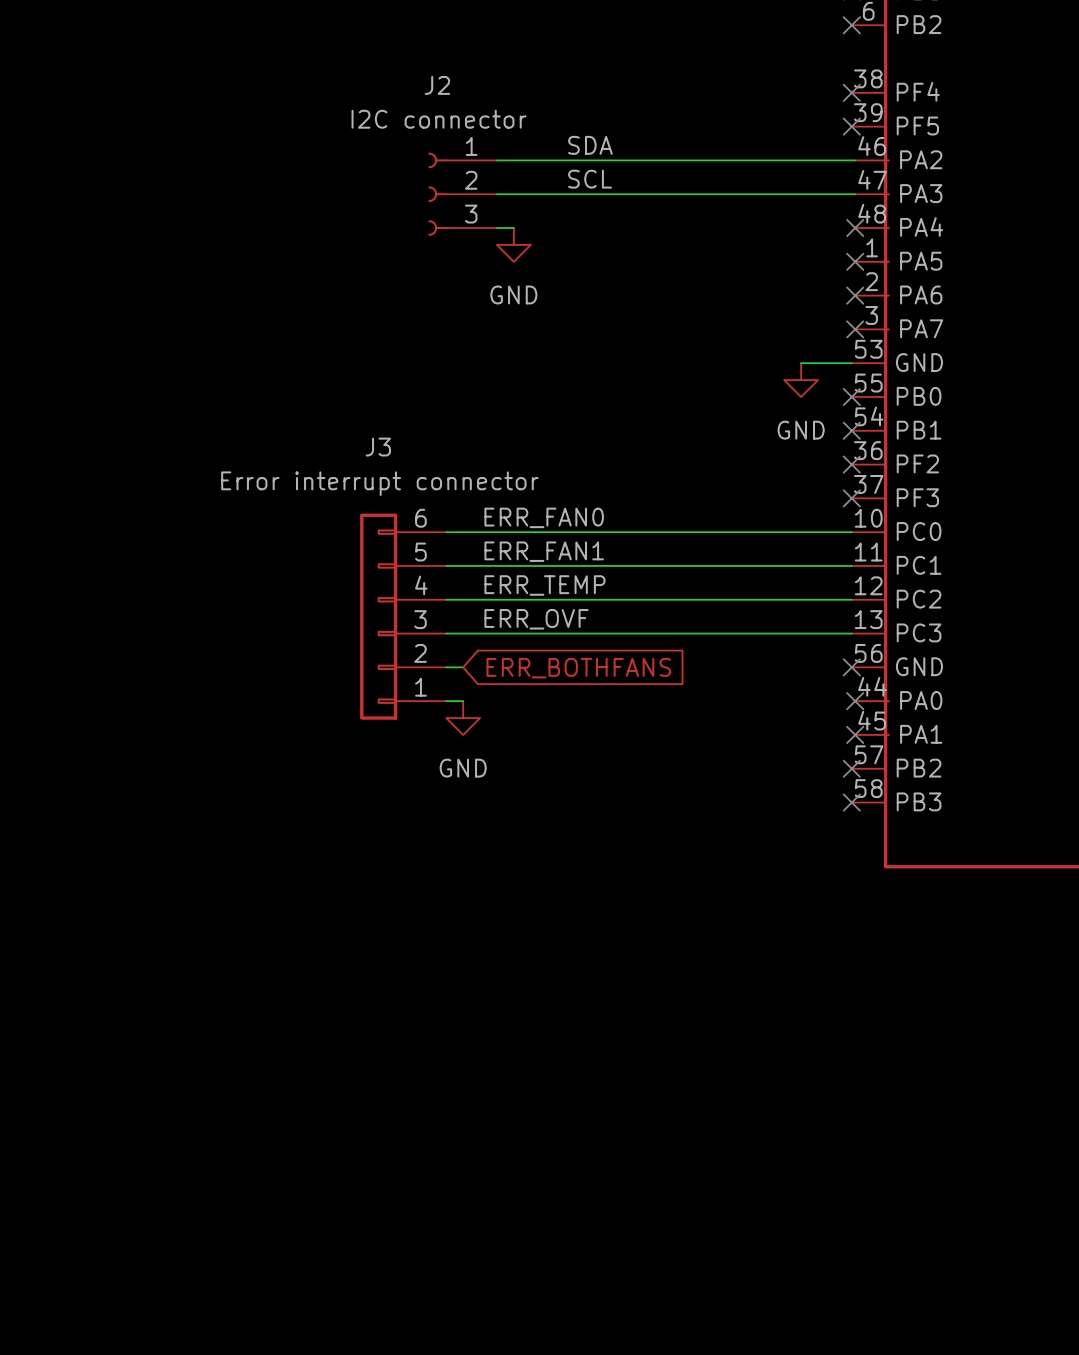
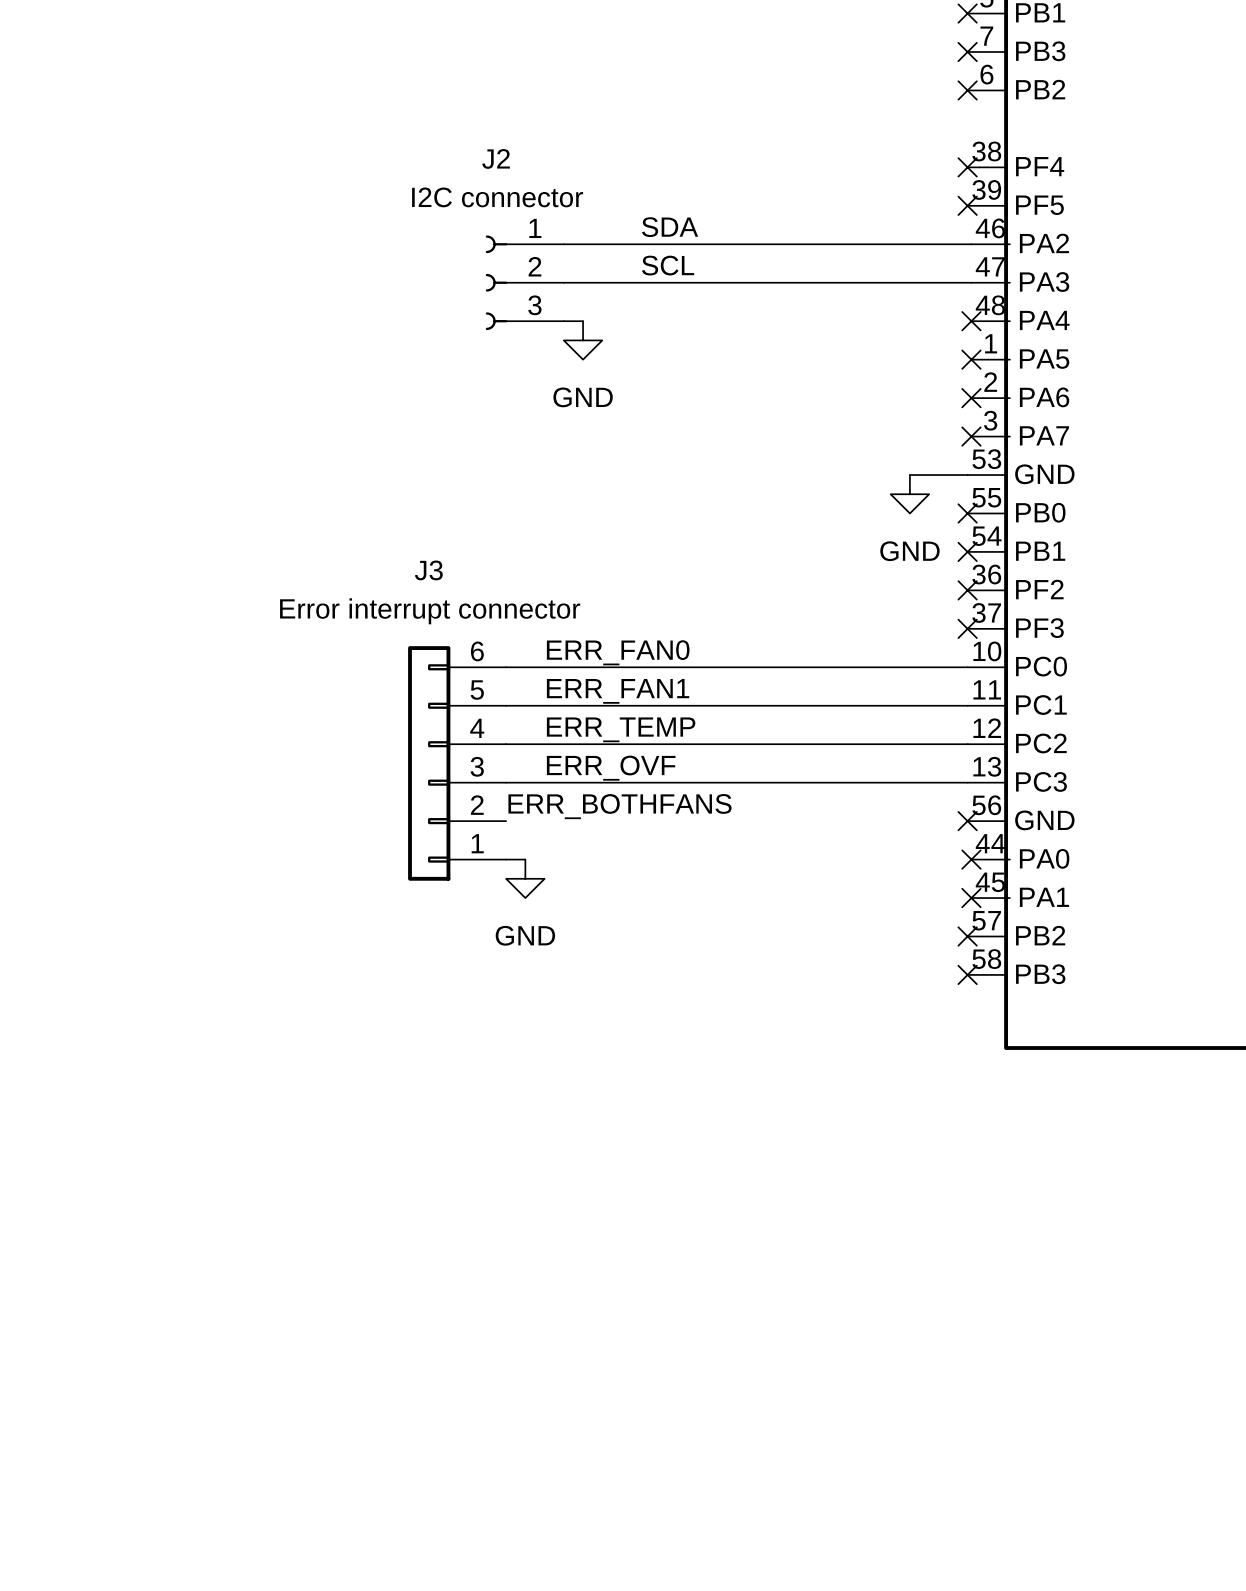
label: none -> ERR_BOTHFANS (620, 806)
wire: (446, 667) (463, 667) -> none
global label: ERR_BOTHFANS (578, 668) -> none

